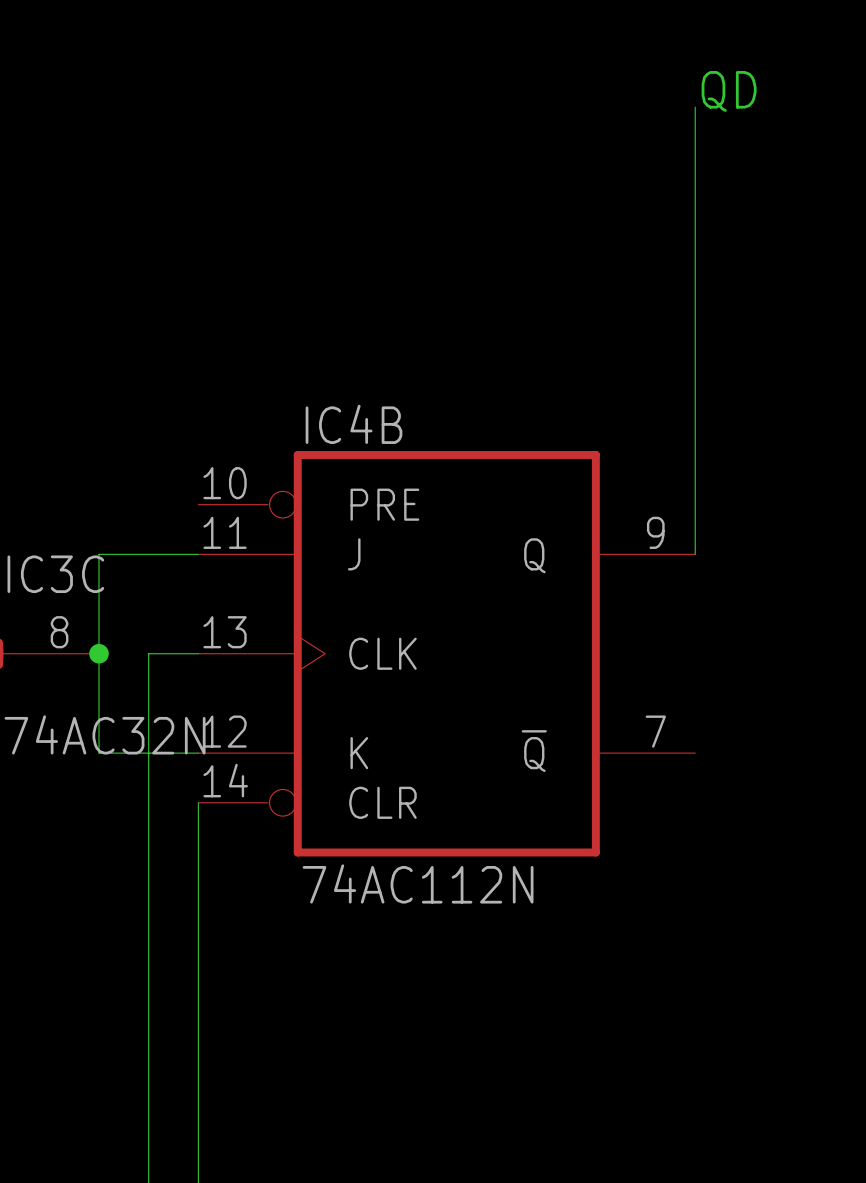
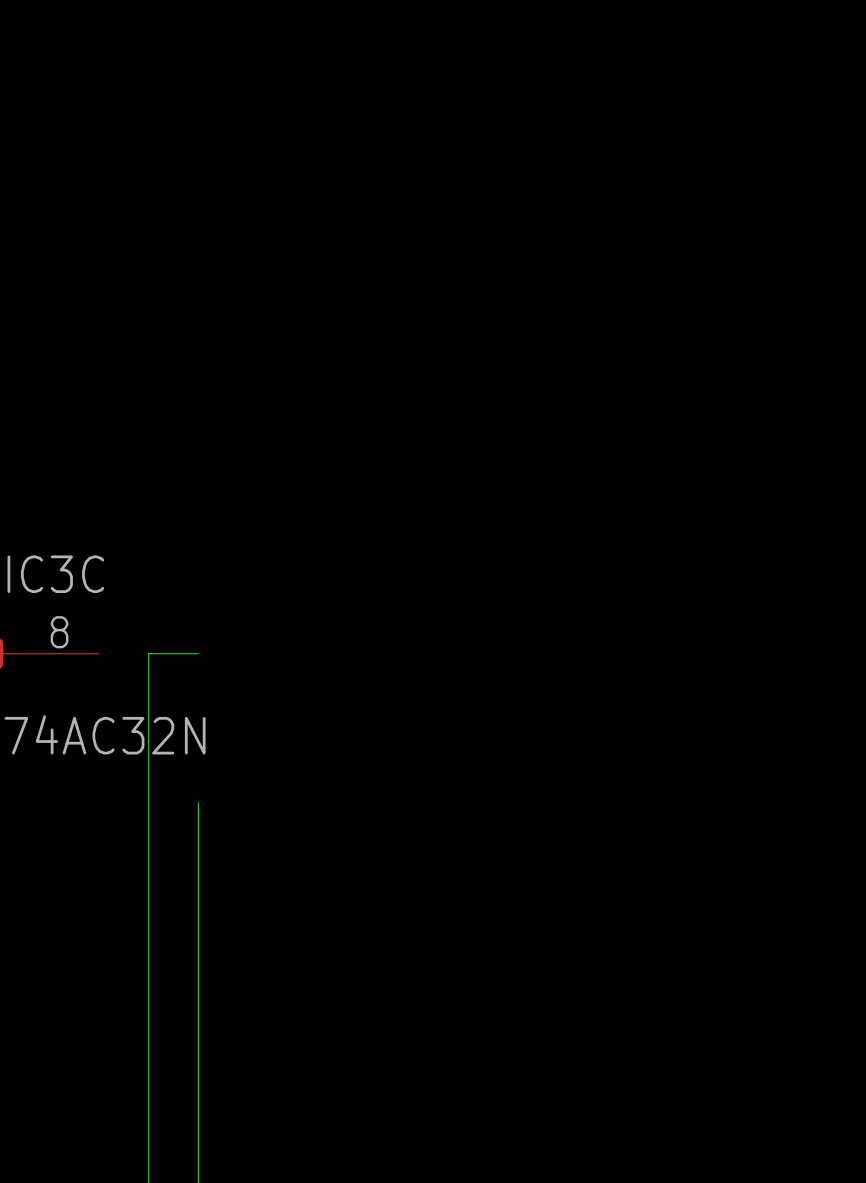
text: QD (729, 91) -> none
wire: (695, 107) (695, 554) -> none
wire: (198, 554) (99, 554) (99, 753) (198, 753) -> none
junction: (99, 653) -> none
IC4B: 74AC112N (446, 653) -> none

